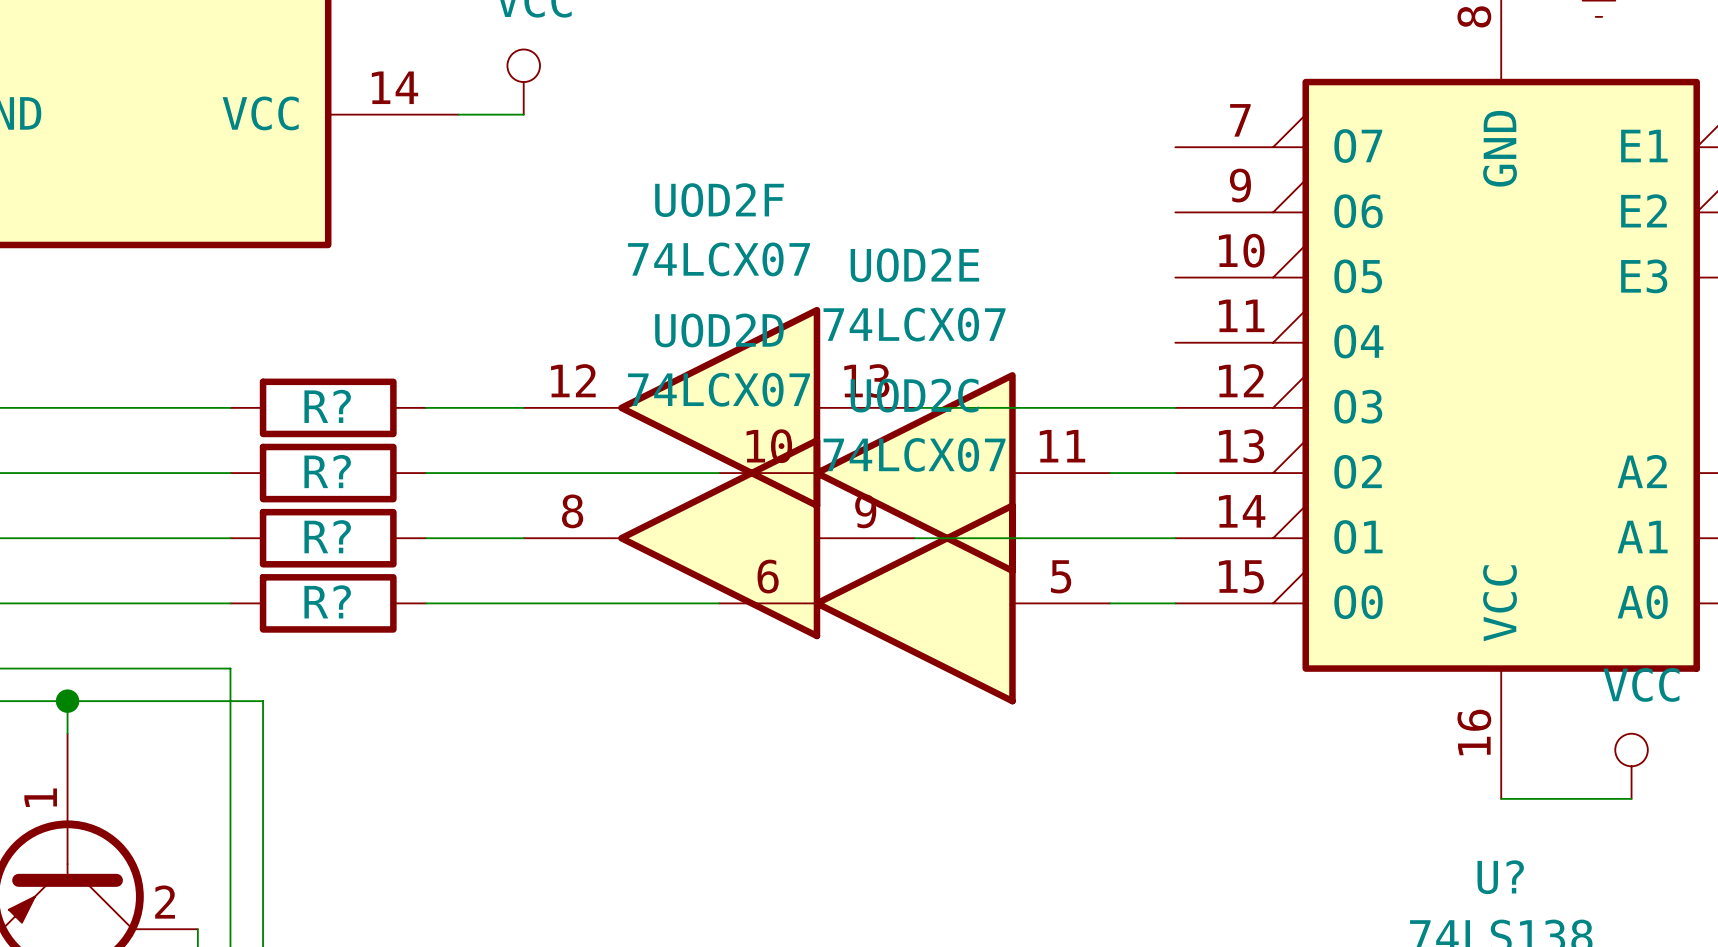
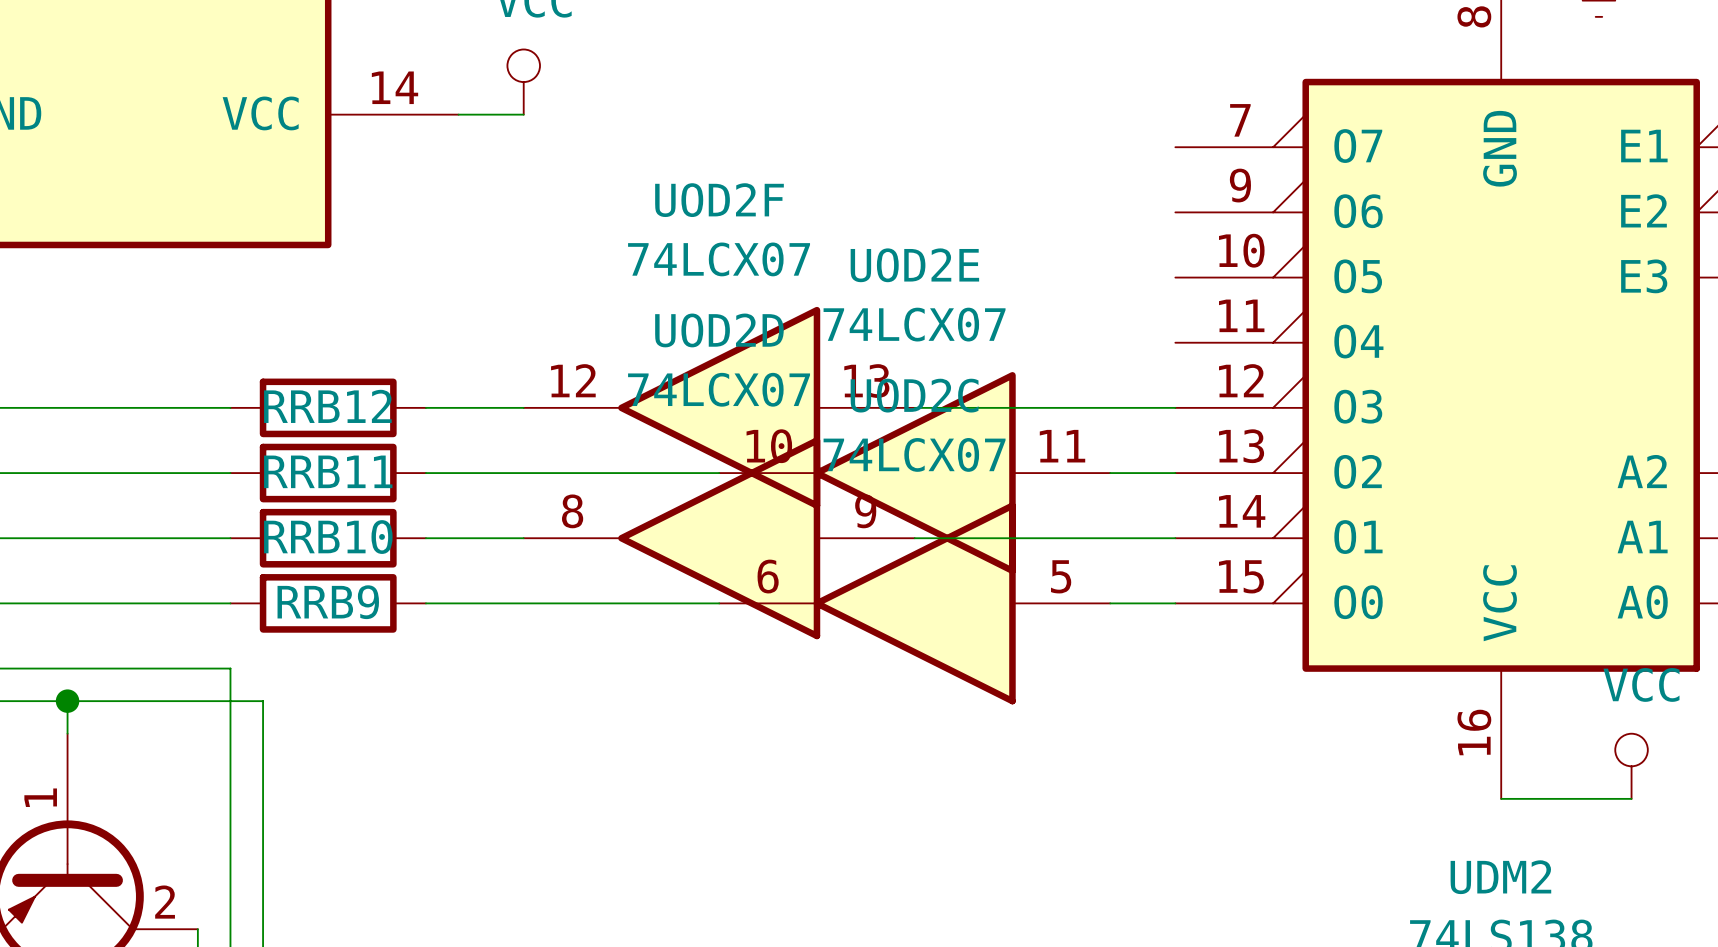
R? name: R? (327, 406) -> RRB12 (327, 406)
R? name: R? (327, 471) -> RRB11 (328, 471)
R? name: R? (327, 536) -> RRB10 (328, 537)
R? name: R? (327, 601) -> RRB9 (328, 602)
U? name: U? (1500, 877) -> UDM2 (1500, 877)

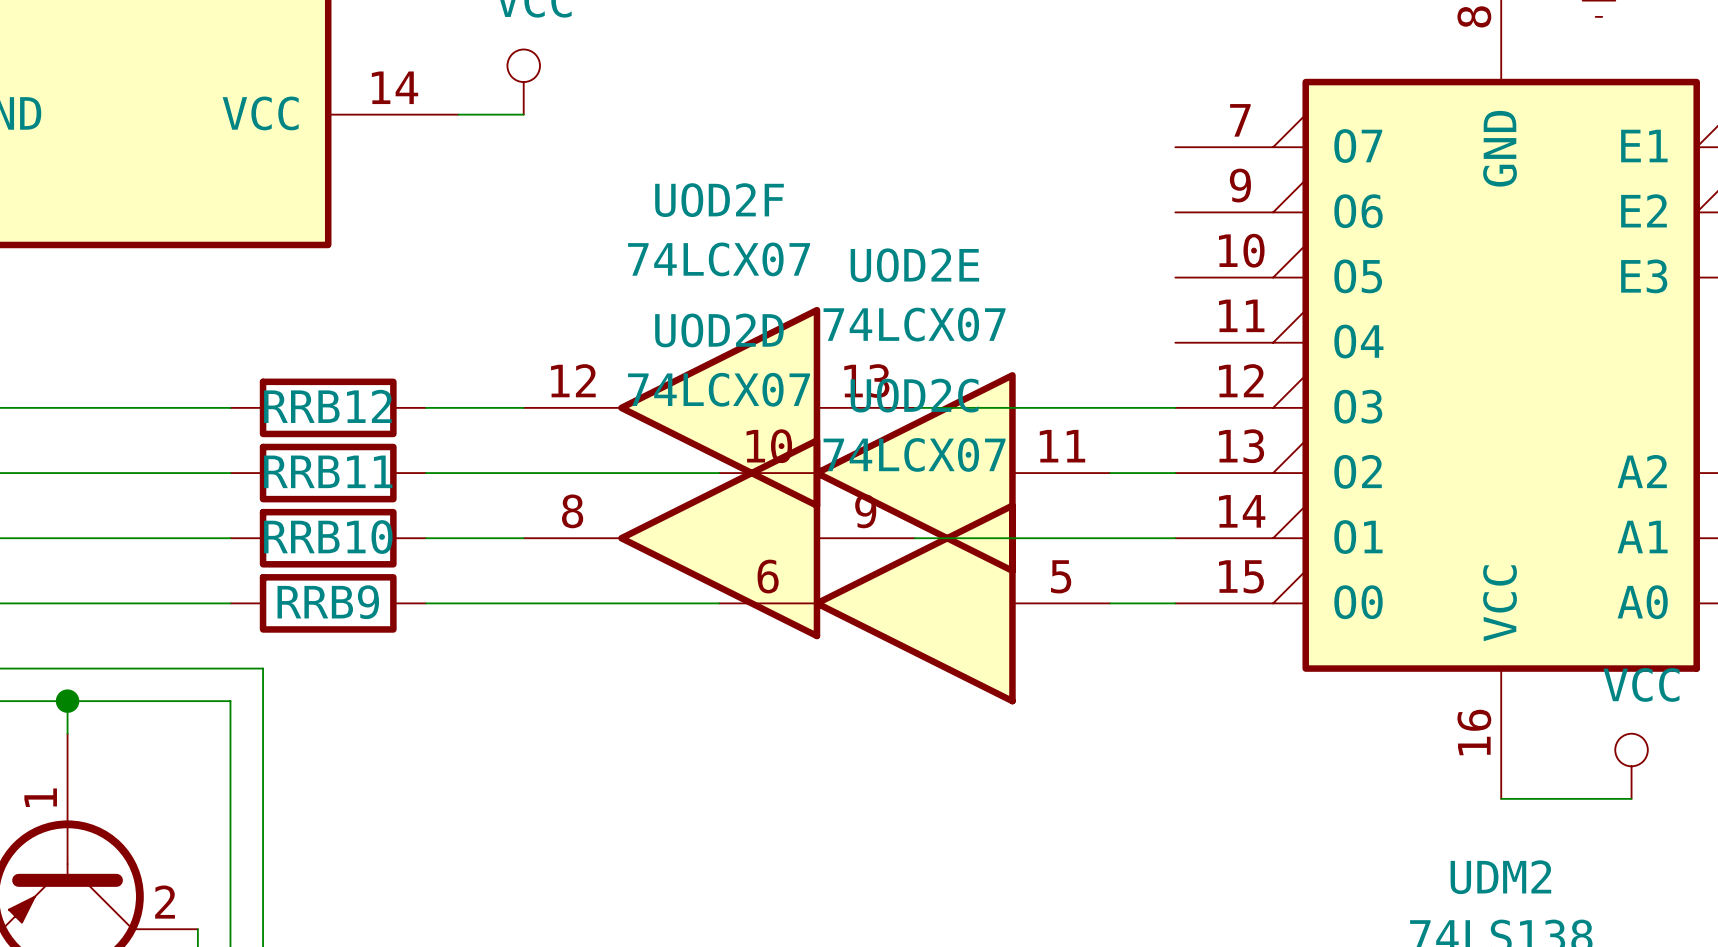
wire: (230, 668) (230, 701) (263, 701) -> (230, 668) (263, 668) (263, 701)

